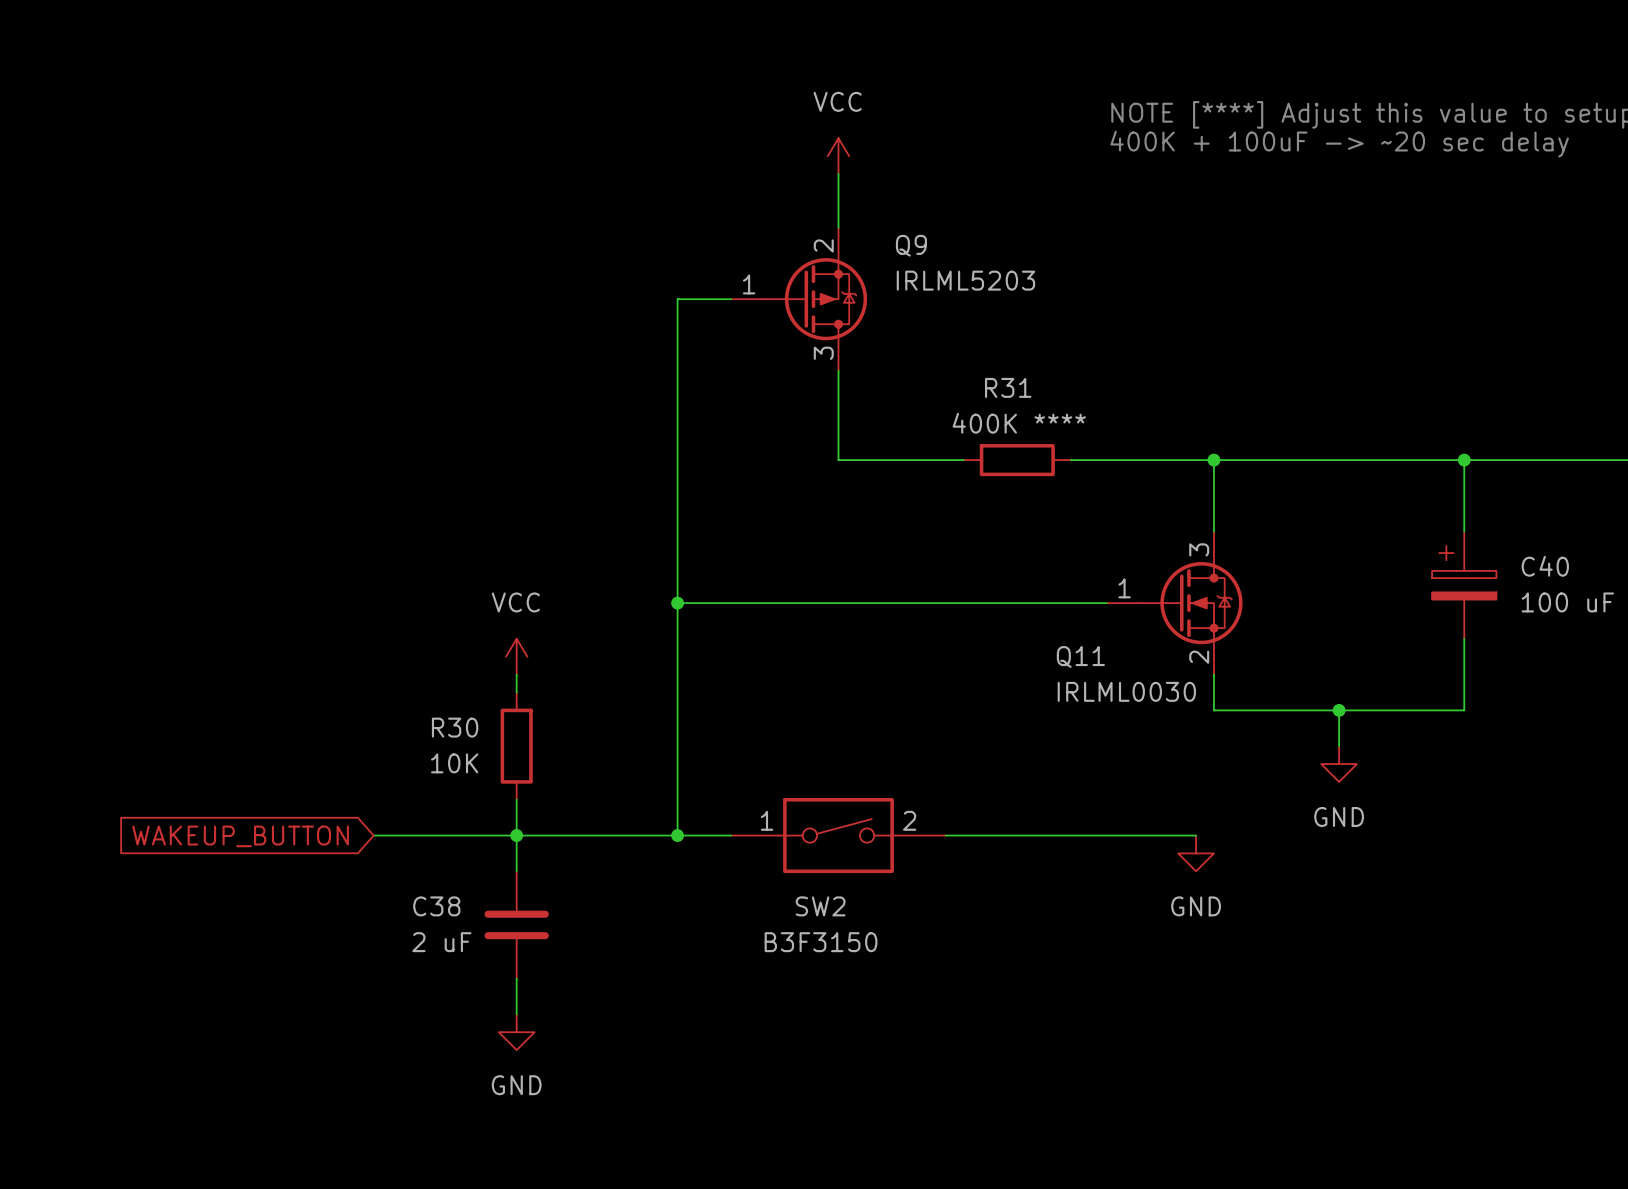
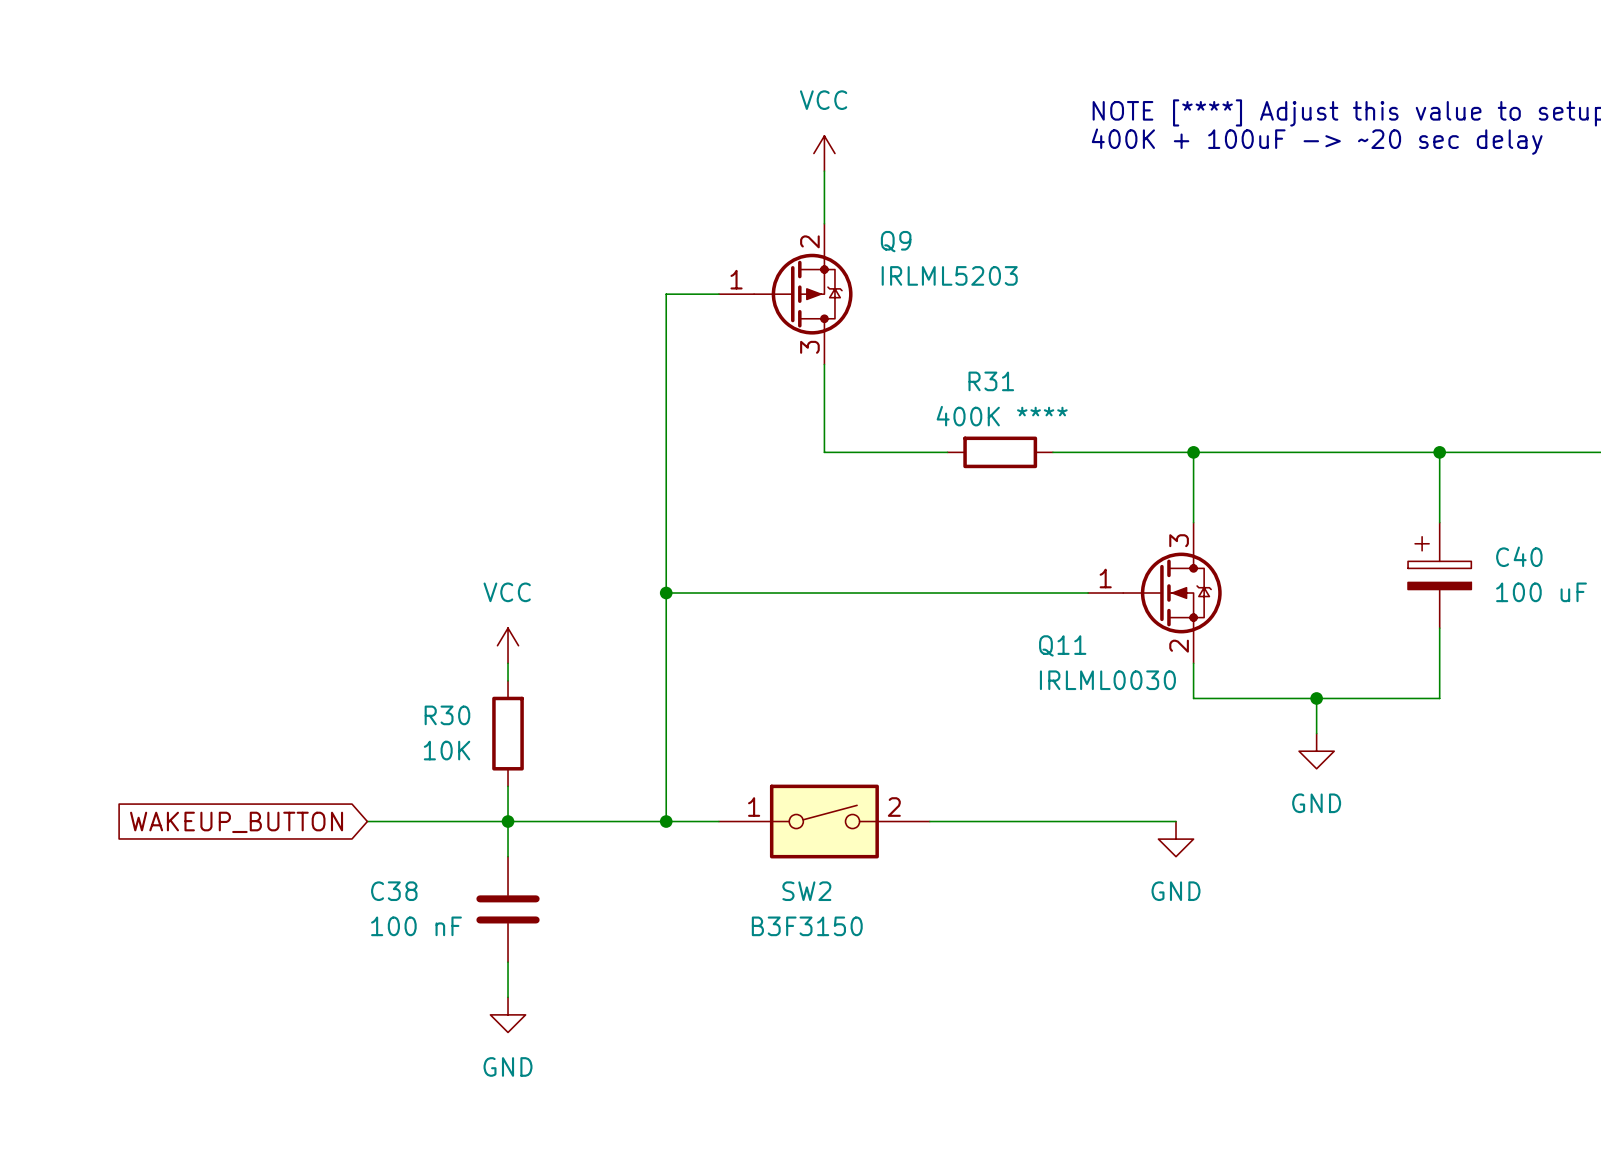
C38 name position: C38 (436, 906) -> C38 (394, 891)
C38 value: 2 uF (441, 942) -> 100 nF (416, 926)

